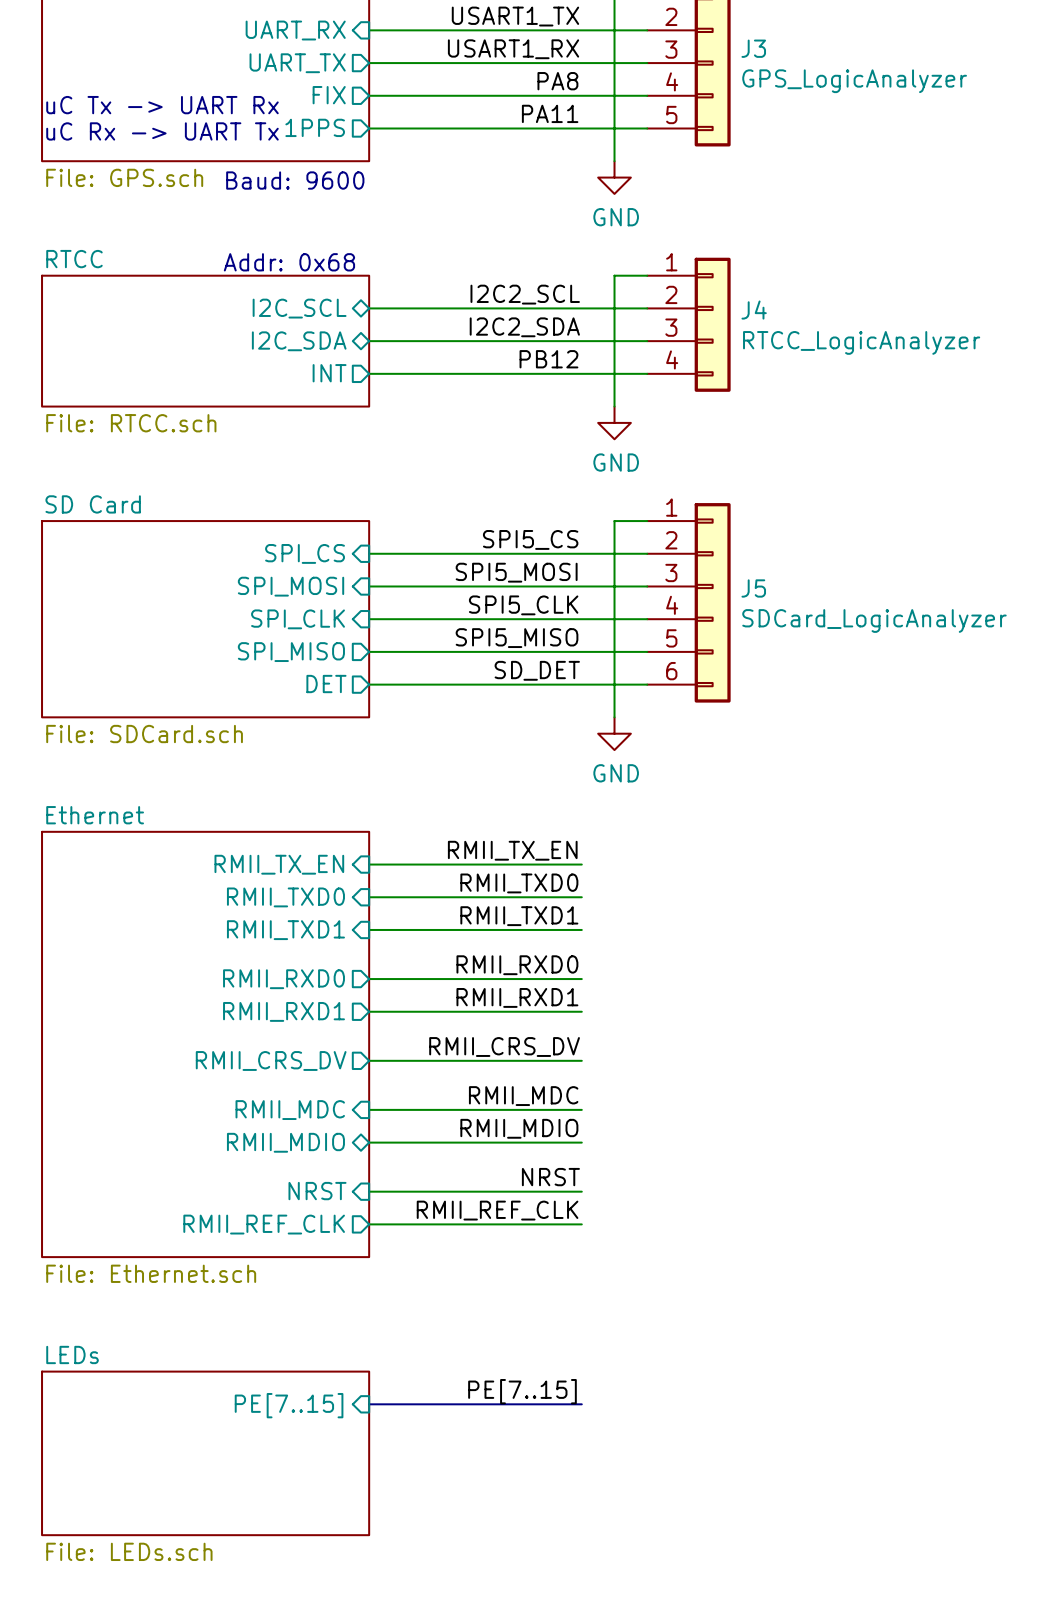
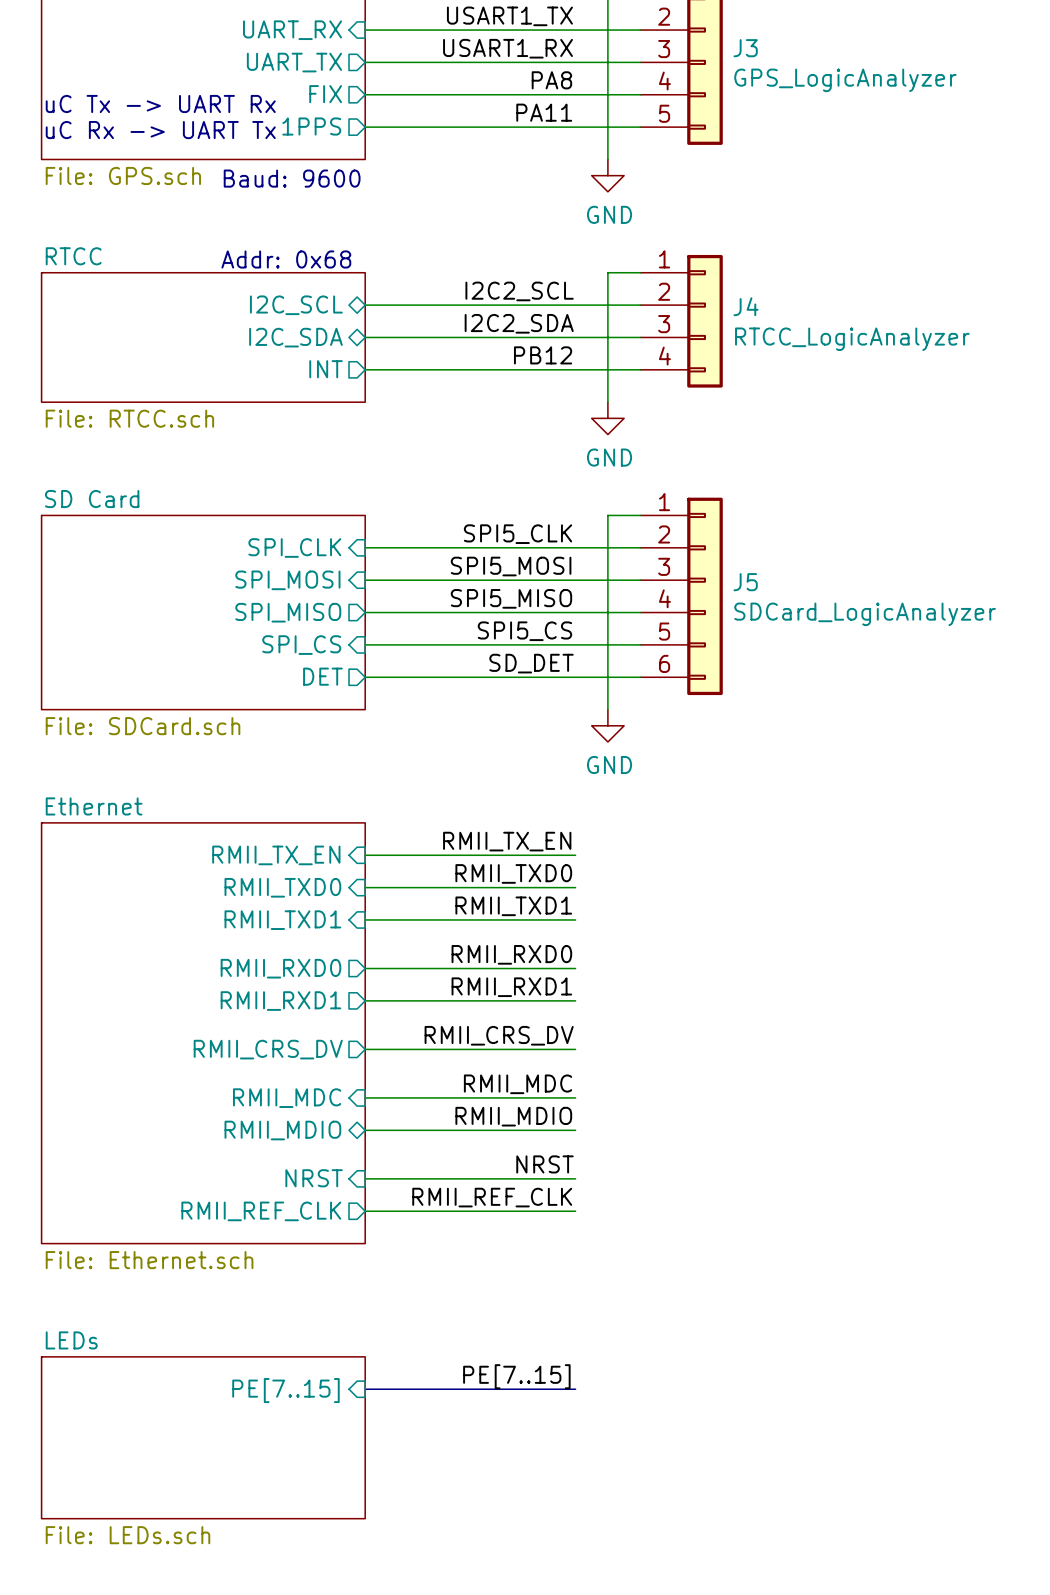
label: SPI5_CS (530, 539) -> SPI5_CLK (518, 534)
sheet pin: SPI_CS (305, 553) -> SPI_CLK (294, 547)
label: SPI5_CLK (523, 605) -> SPI5_MISO (511, 598)
sheet pin shape: input (298, 619) -> output (288, 612)
sheet pin: SPI_CLK (298, 619) -> SPI_MISO (288, 612)
label: SPI5_MISO (517, 638) -> SPI5_CS (524, 631)
sheet pin shape: output (291, 652) -> input (301, 645)
sheet pin: SPI_MISO (291, 652) -> SPI_CS (301, 645)

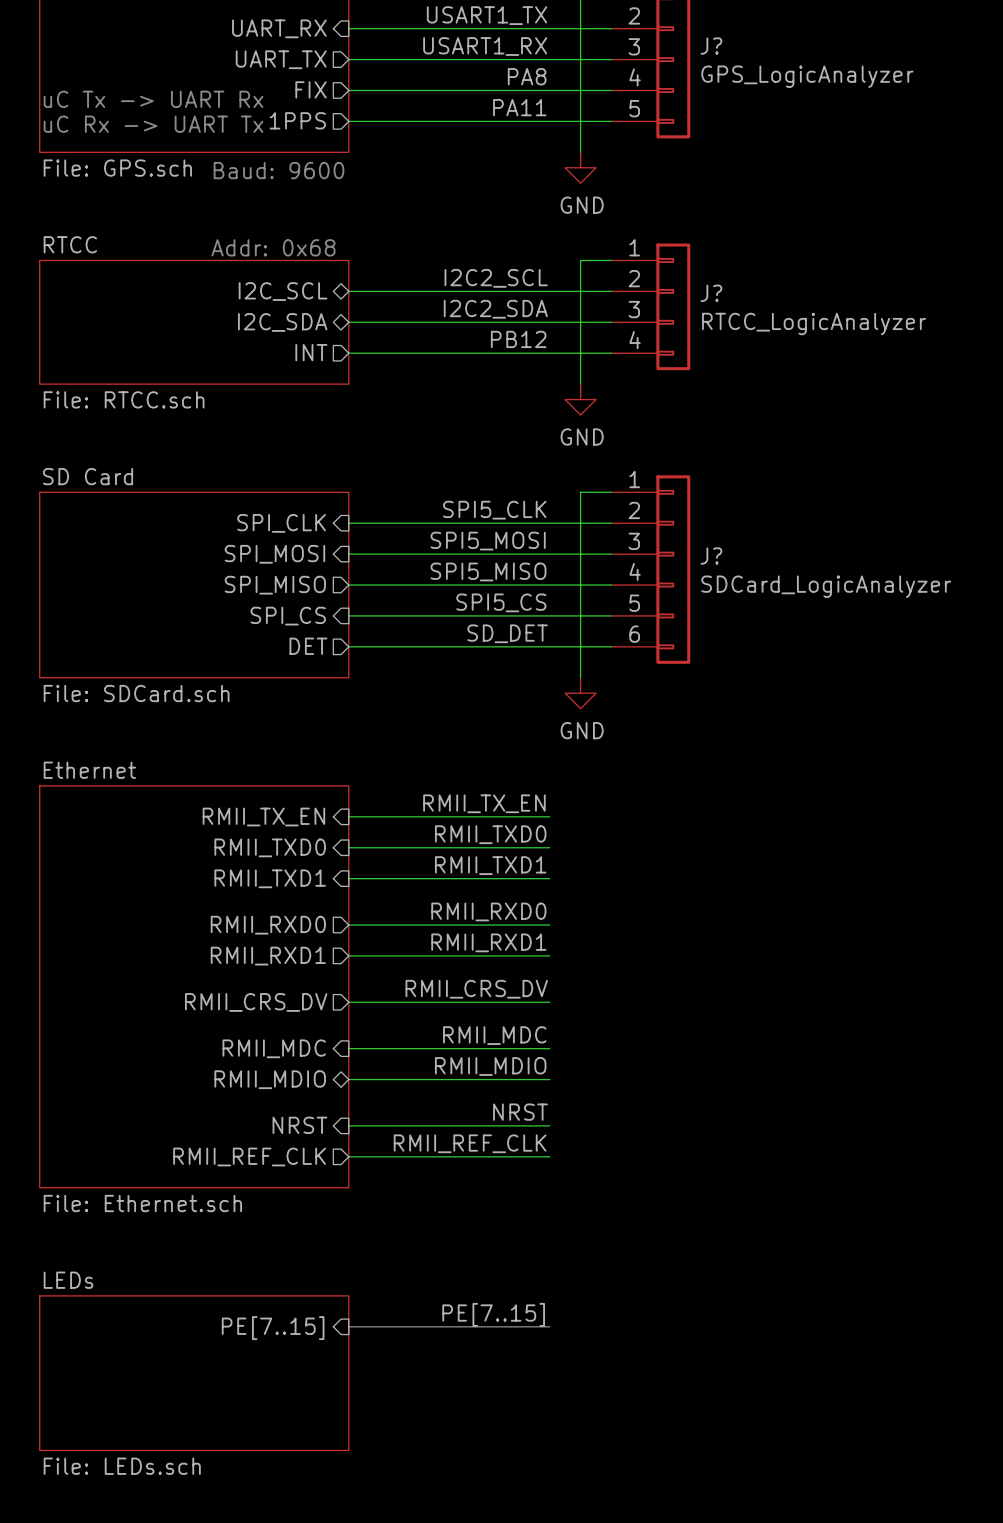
J3 name: J3 (745, 48) -> J? (711, 46)
J4 name: J4 (746, 306) -> J? (711, 293)
J5 name: J5 (745, 582) -> J? (711, 556)

